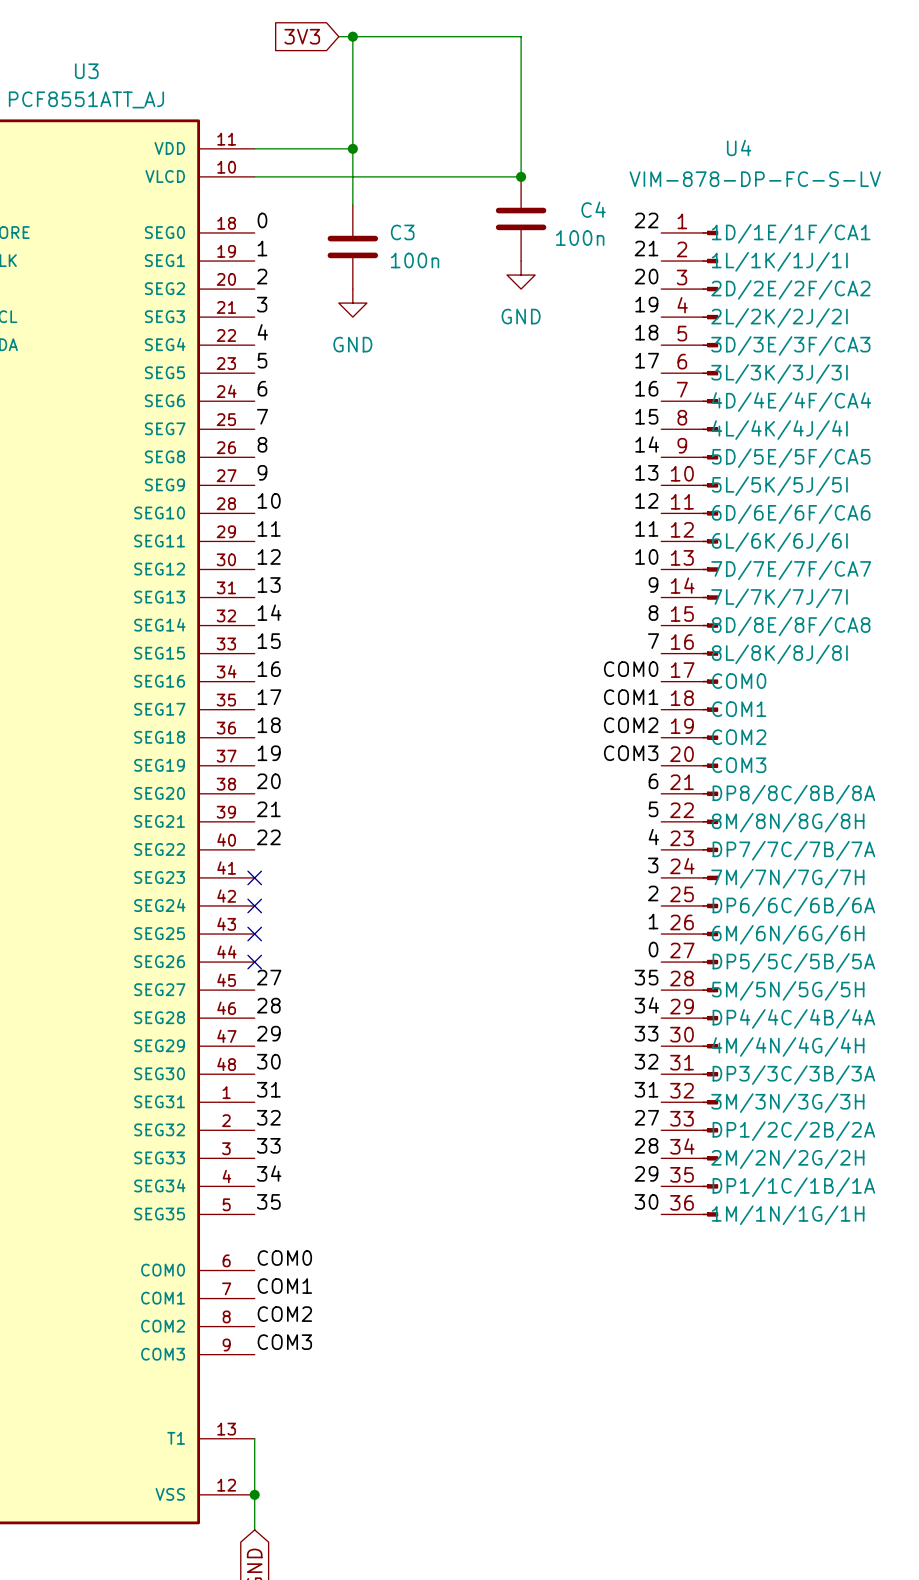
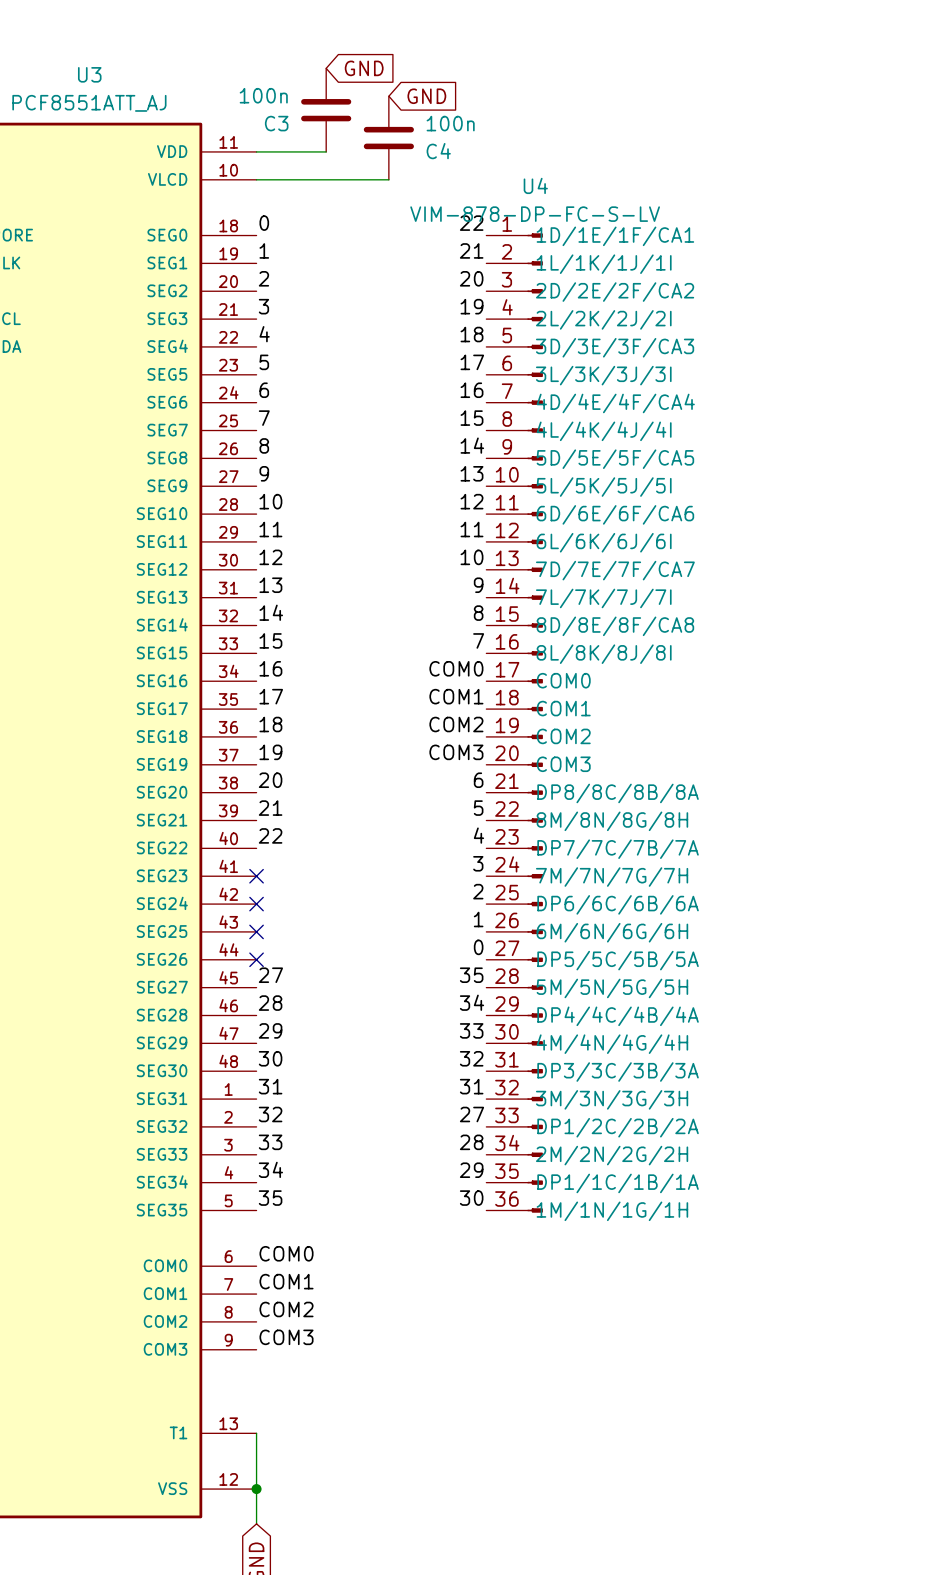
global label: 3V3 (302, 36) -> none
wire: (338, 36) (521, 36) (521, 176) (387, 176) -> none
wire: (352, 36) (352, 204) -> none
junction: (352, 36) -> none
global label: none -> GND (364, 68)
global label: none -> GND (426, 96)
wire: (324, 148) (352, 148) -> none
junction: (352, 148) -> none
U4 name position: U4 (739, 148) -> U4 (535, 185)
junction: (521, 176) -> none
U4 value position: VIM-878-DP-FC-S-LV (755, 179) -> VIM-878-DP-FC-S-LV (535, 214)
C4 name position: C4 (593, 209) -> C4 (438, 151)
C4 position: (521, 218) -> (388, 138)
label position: 22 (646, 220) -> 22 (471, 223)
C3 name position: C3 (402, 232) -> C3 (276, 123)
C4 value position: 100n (580, 238) -> 100n (450, 123)
C3 position: (352, 247) -> (326, 110)
label position: 21 (646, 248) -> 21 (471, 250)
C3 value position: 100n (415, 260) -> 100n (263, 95)
power symbol: GND (521, 275) -> none
label position: 20 (646, 276) -> 20 (471, 278)
power symbol: GND (352, 303) -> none
label position: 19 (646, 304) -> 19 (472, 306)
label position: 18 (646, 332) -> 18 (472, 334)
label position: 17 (647, 360) -> 17 (472, 362)
label position: 16 (646, 388) -> 16 (472, 390)
label position: 15 (646, 416) -> 15 (472, 418)
label position: 14 (647, 444) -> 14 (472, 445)
label position: 13 (646, 472) -> 13 (472, 473)
label position: 12 (646, 500) -> 12 (472, 501)
label position: 11 (646, 528) -> 11 (472, 529)
label position: 10 (646, 556) -> 10 (472, 557)
label position: 9 (653, 585) -> 9 (478, 585)
label position: 8 (653, 613) -> 8 (478, 613)
label position: 7 (653, 641) -> 7 (478, 640)
label position: COM0 (631, 669) -> COM0 (456, 668)
label position: COM1 (631, 697) -> COM1 (456, 696)
U4 position: (689, 723) -> (514, 723)
label position: COM2 (631, 725) -> COM2 (456, 724)
label position: COM3 (631, 753) -> COM3 (456, 752)
label position: 6 (653, 781) -> 6 (478, 780)
label position: 5 (653, 809) -> 5 (478, 808)
label position: 4 (653, 837) -> 4 (478, 835)
label position: 3 (653, 865) -> 3 (478, 863)
label position: 2 (653, 893) -> 2 (478, 891)
label position: 1 (653, 921) -> 1 (478, 919)
label position: 0 (653, 949) -> 0 (478, 947)
label position: 35 (646, 977) -> 35 (471, 975)
label position: 34 (646, 1005) -> 34 (472, 1002)
label position: 33 (646, 1033) -> 33 (471, 1030)
label position: 32 (646, 1061) -> 32 (471, 1058)
label position: 31 (646, 1089) -> 31 (471, 1086)
label position: 27 (646, 1117) -> 27 (472, 1114)
label position: 28 (646, 1145) -> 28 (471, 1142)
label position: 29 (646, 1173) -> 29 (471, 1170)
label position: 30 (646, 1201) -> 30 (471, 1198)

